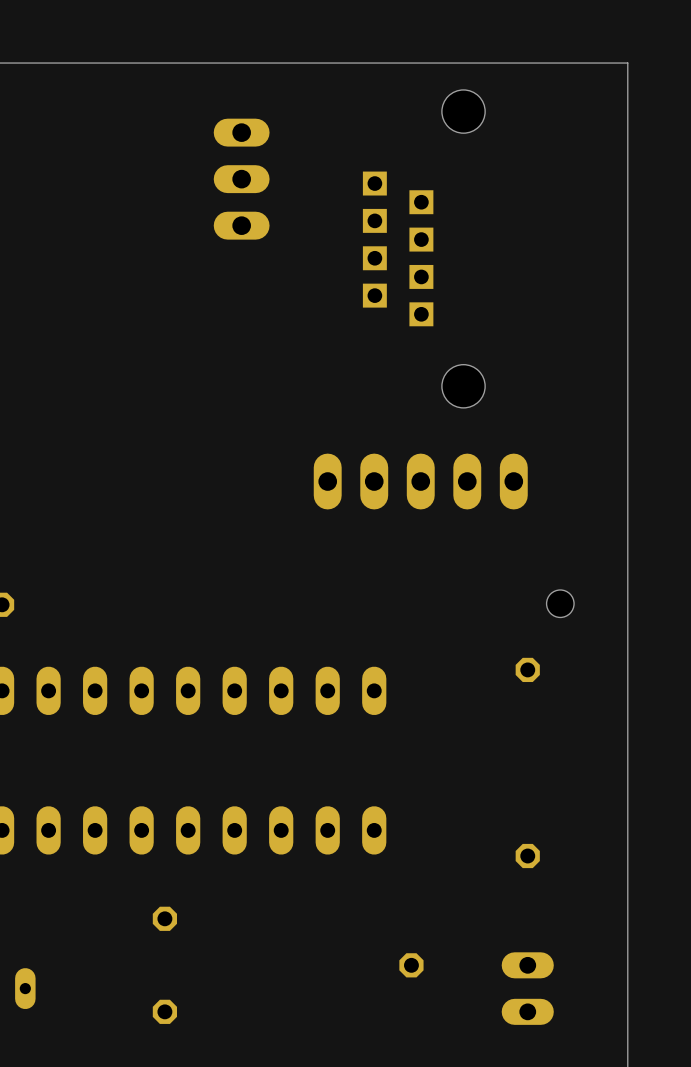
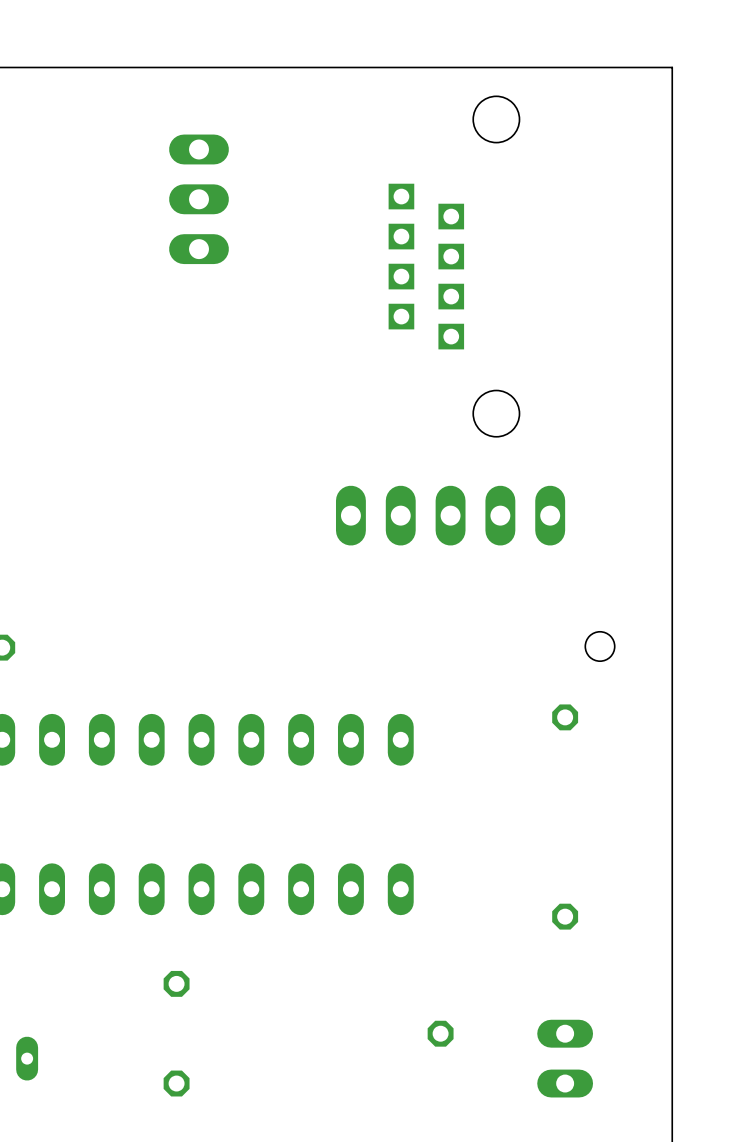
part position: (241, 179) -> (199, 199)

